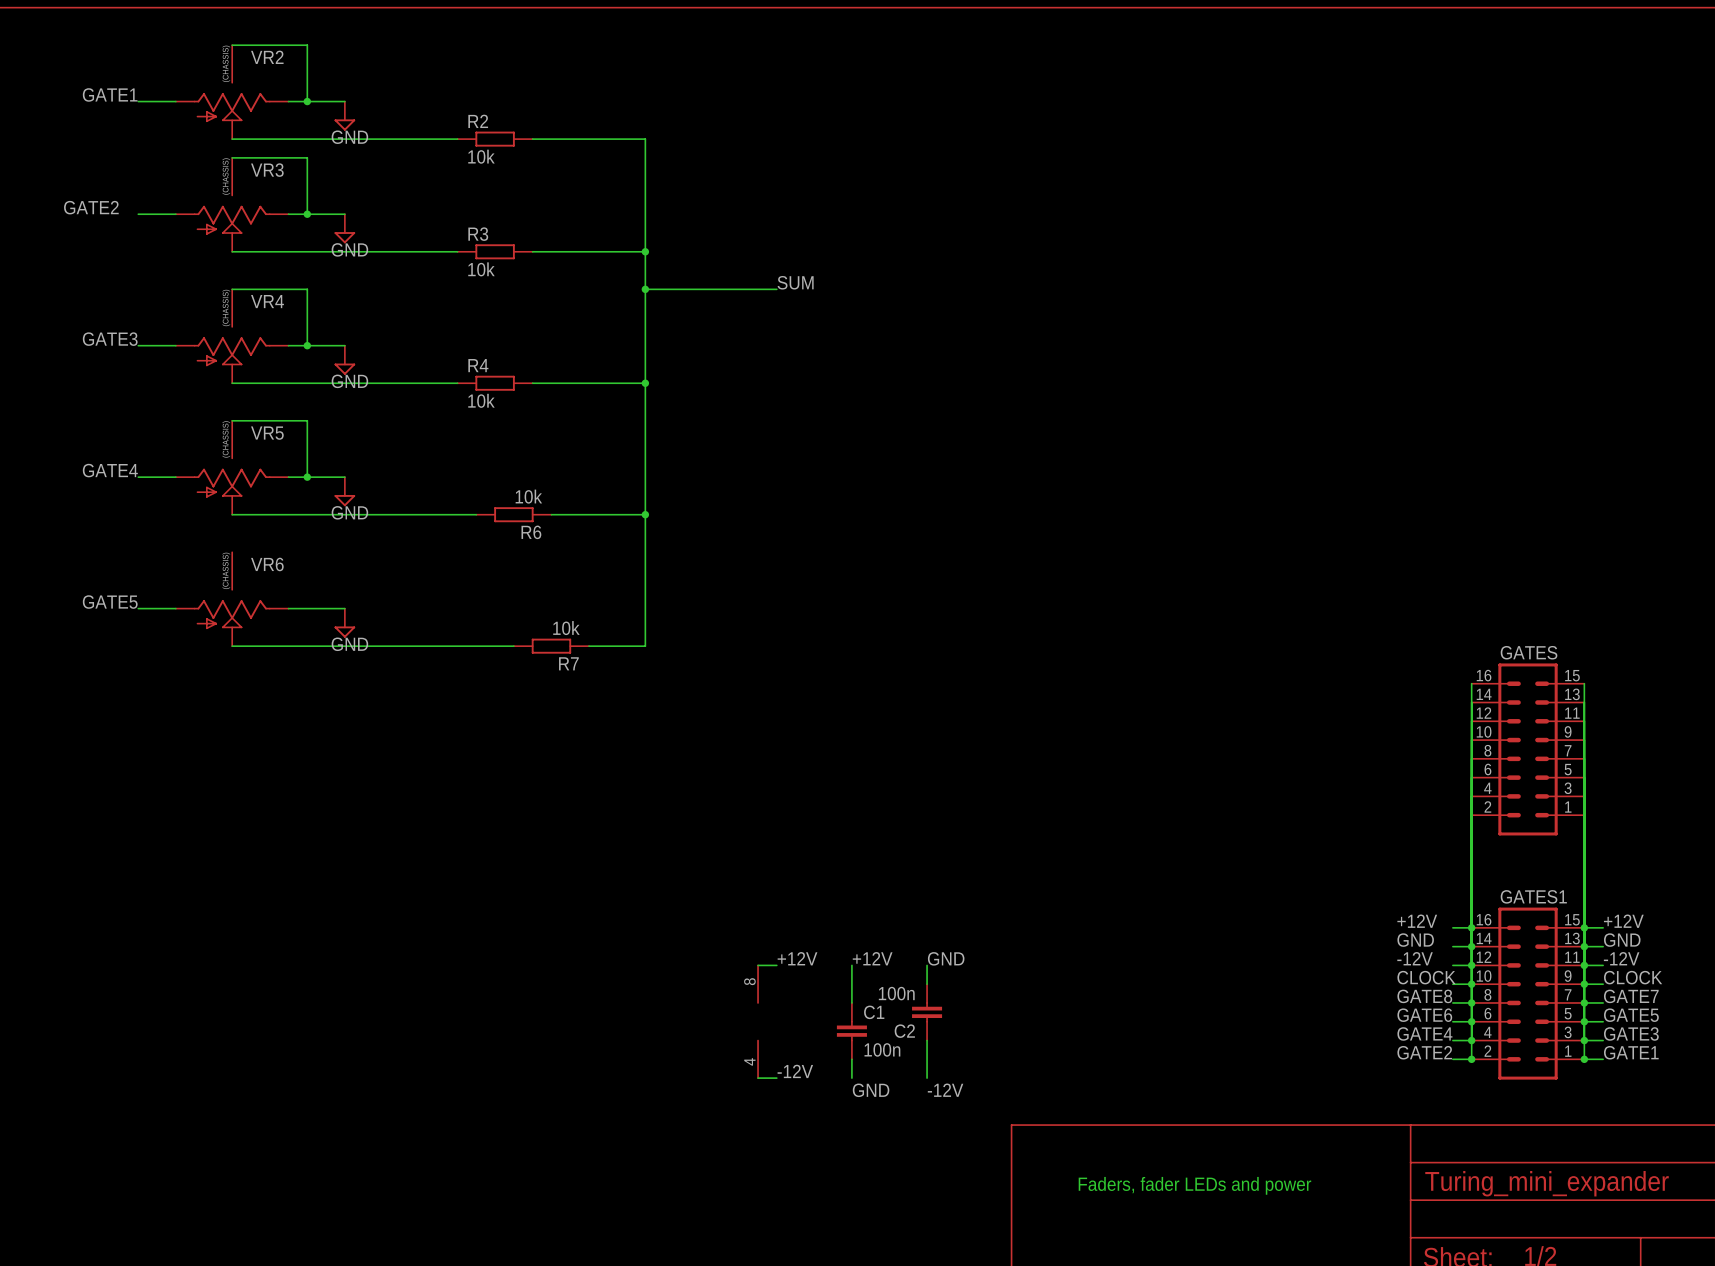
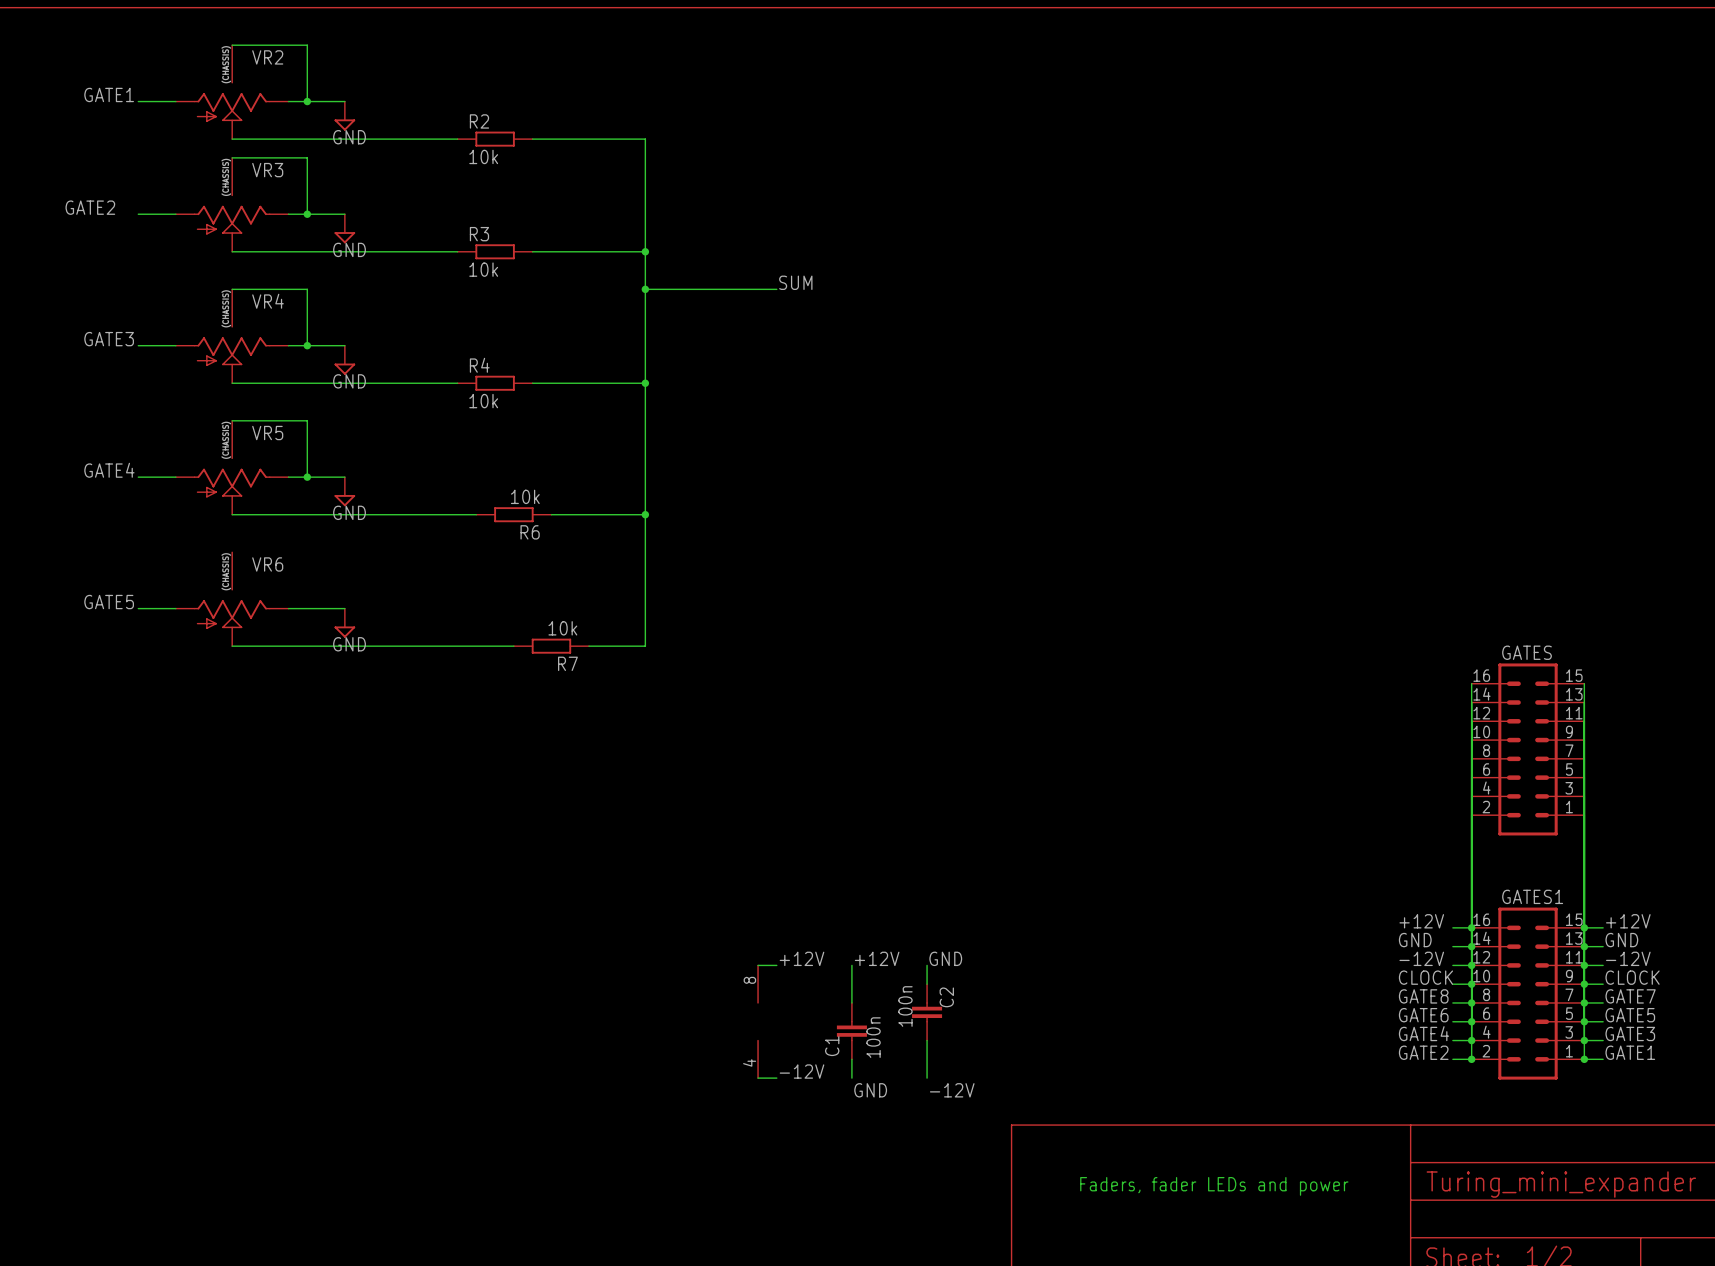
C2 value rotation: 0° (896, 993) -> 90° counterclockwise (905, 1006)
C1 name rotation: 0° (874, 1012) -> 90° counterclockwise (832, 1046)
C1 name position: C1 (874, 1012) -> C1 (832, 1046)
C2 name rotation: 0° (904, 1031) -> 90° counterclockwise (946, 997)
C2 name position: C2 (904, 1031) -> C2 (946, 997)
C1 value rotation: 0° (882, 1049) -> 90° counterclockwise (873, 1037)

